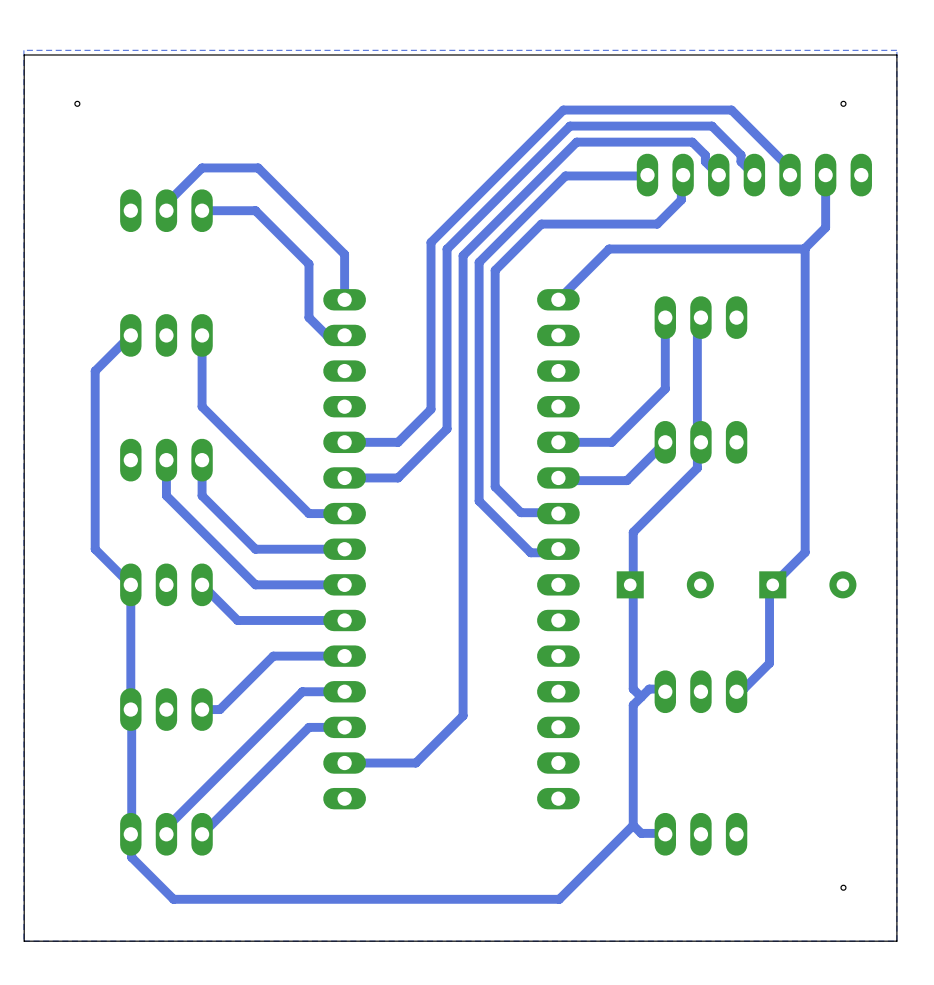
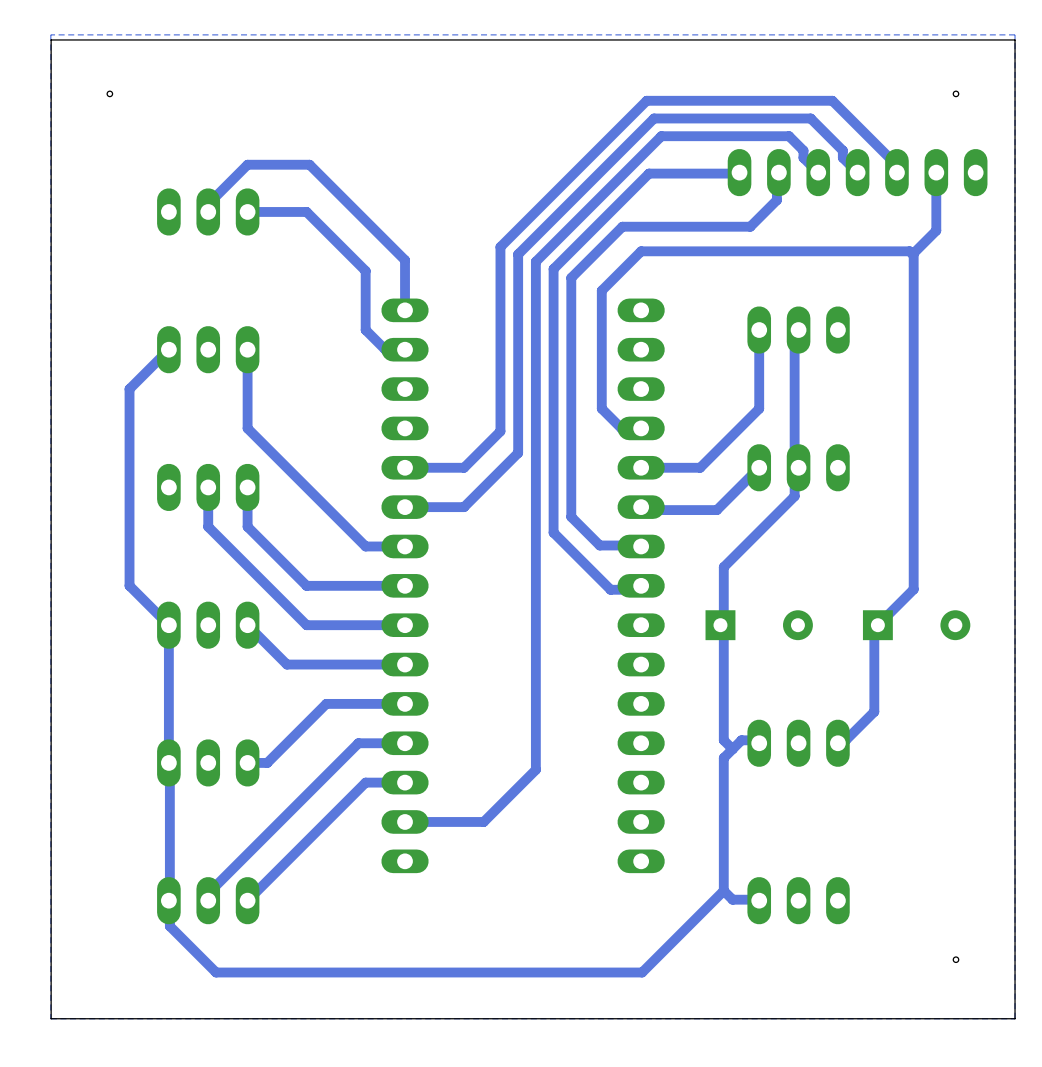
track: (804, 249) (609, 249) (558, 299) -> (912, 254) (909, 251) (641, 251) (601, 290) (601, 408) (621, 428) (641, 428)

